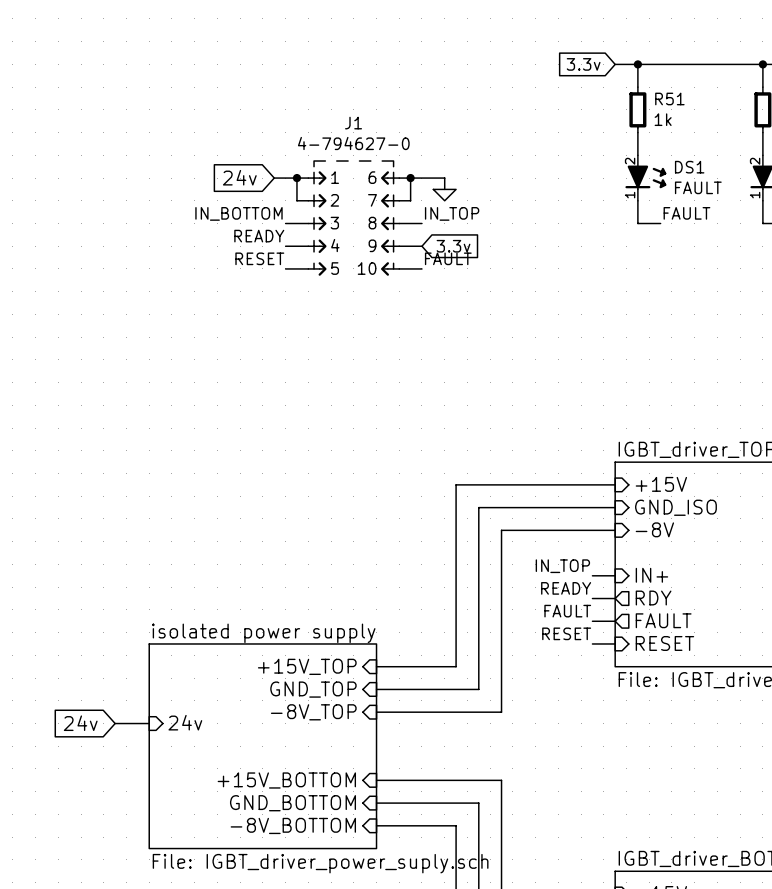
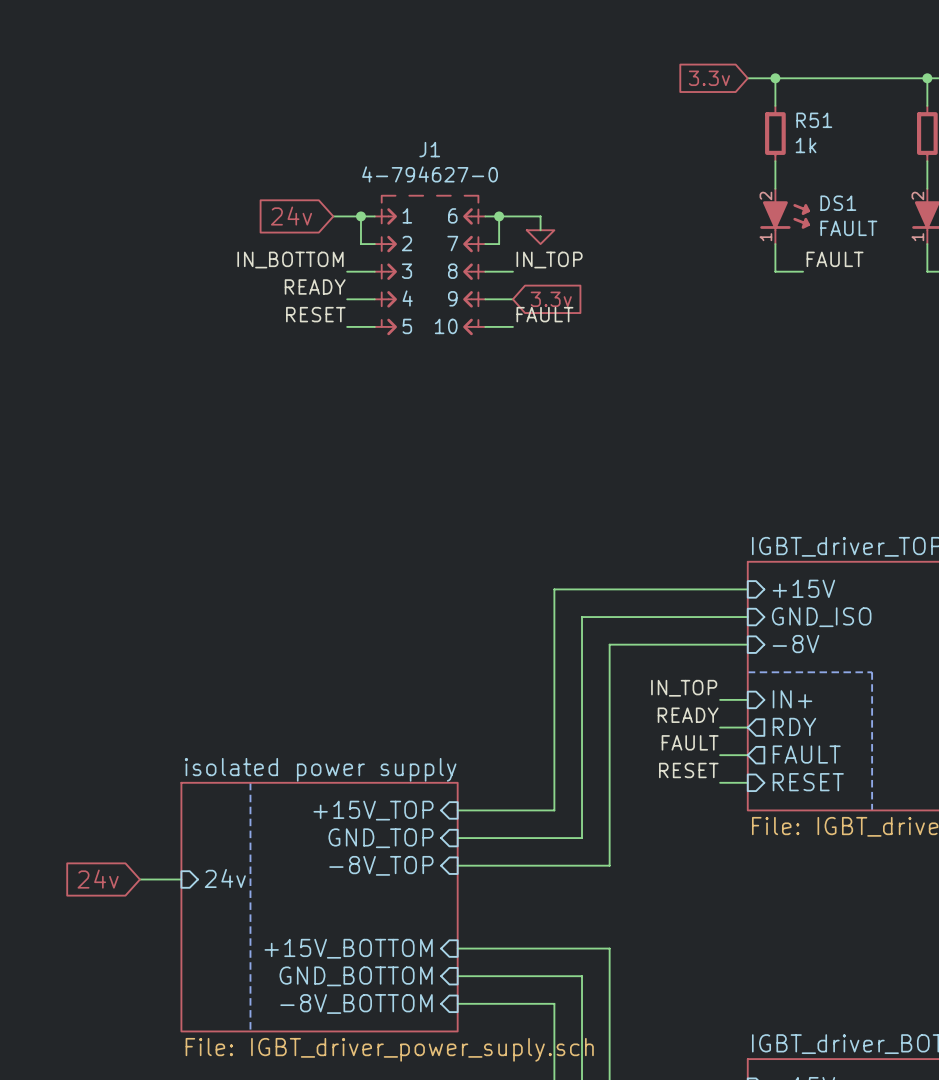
line: none -> (747, 672) (872, 672) (872, 810)
line: none -> (250, 782) (250, 1031)

